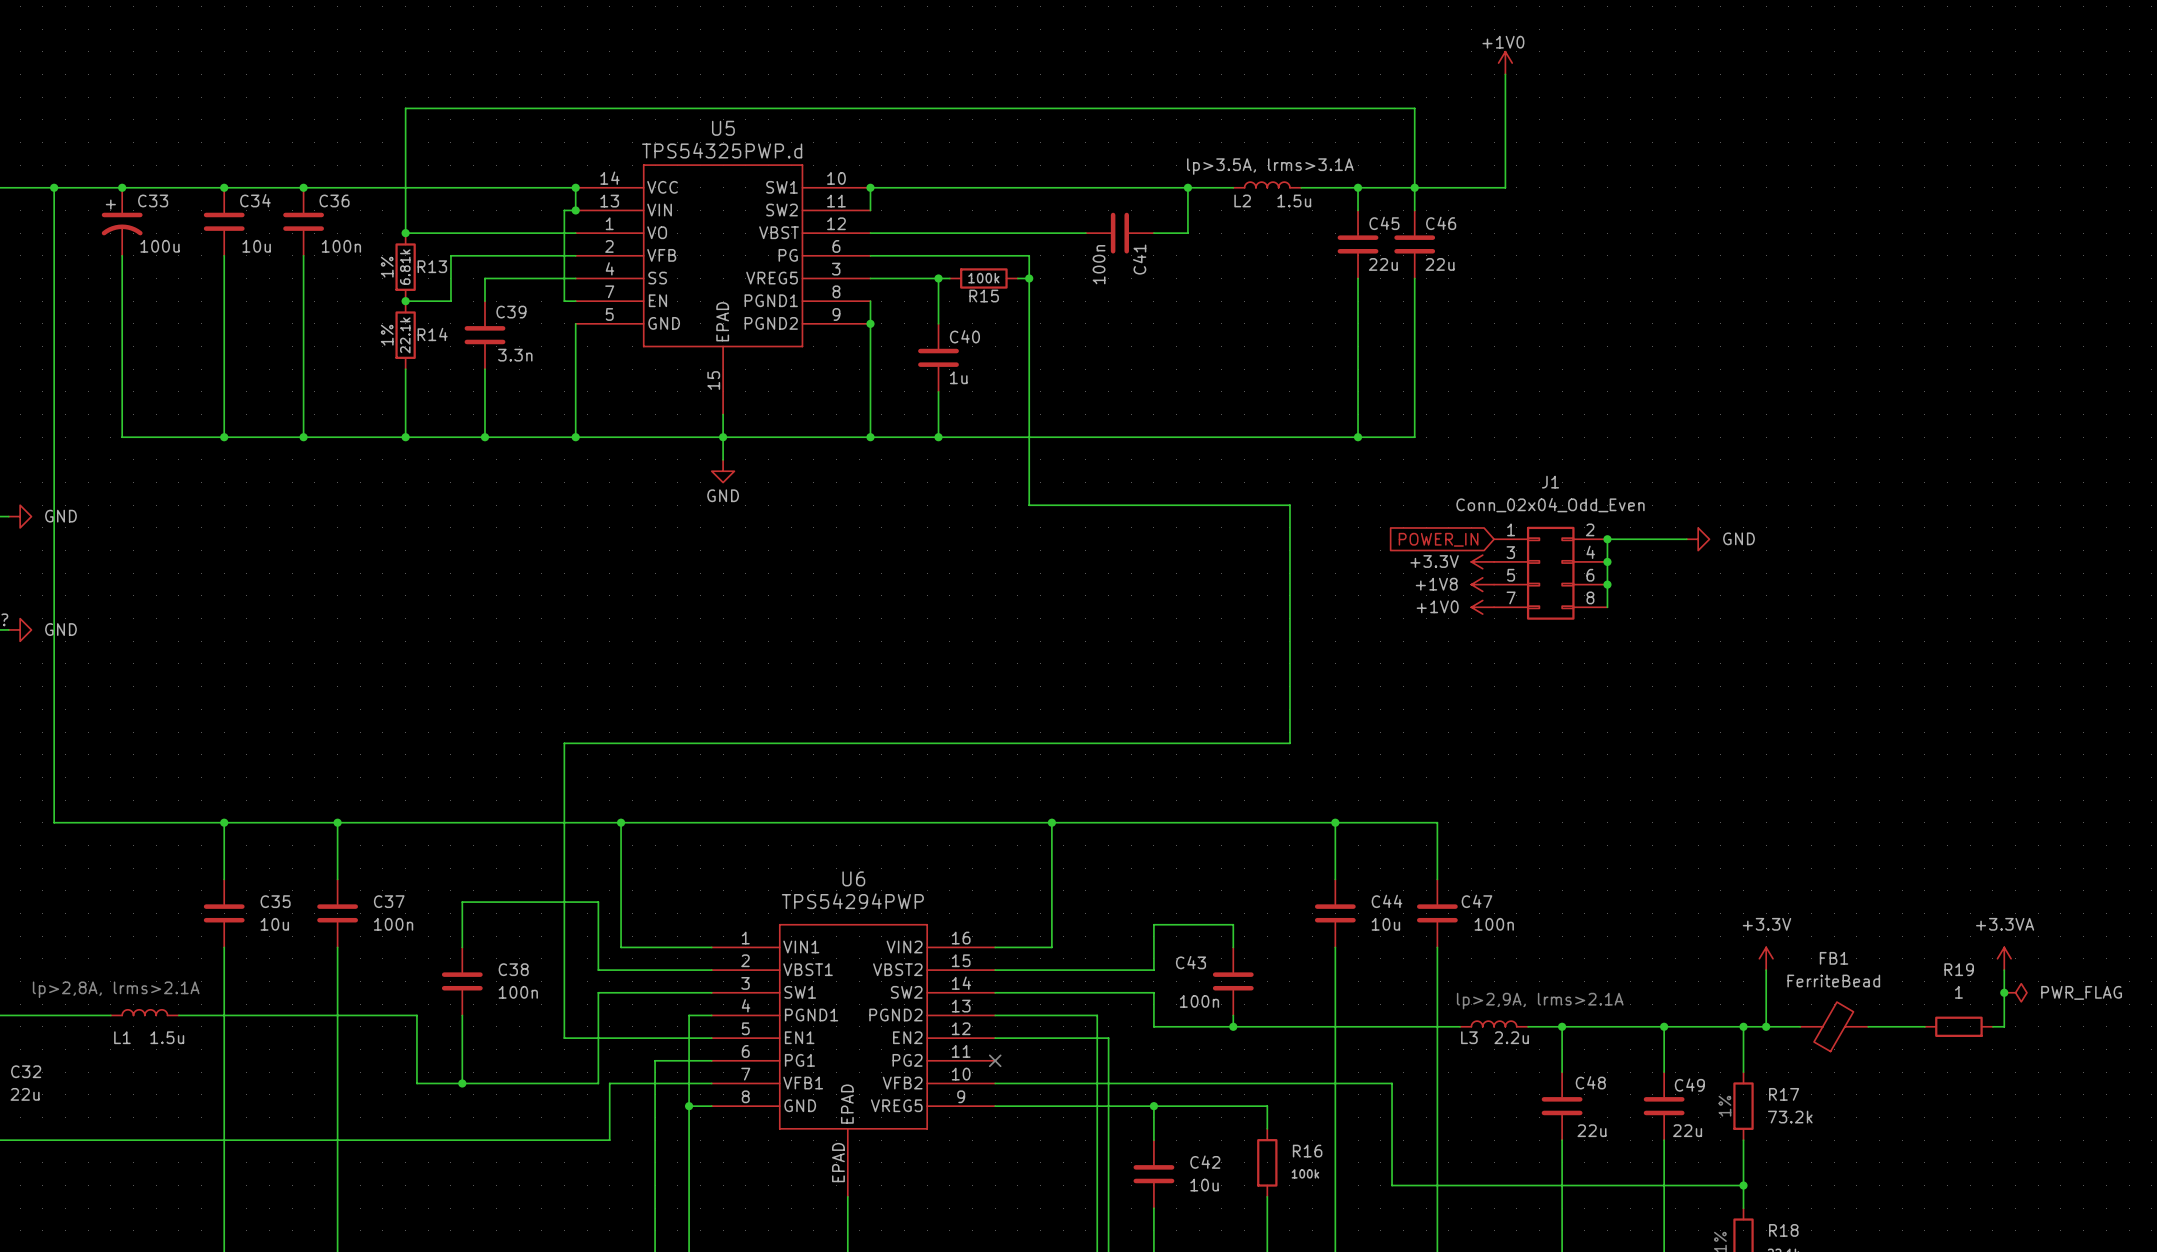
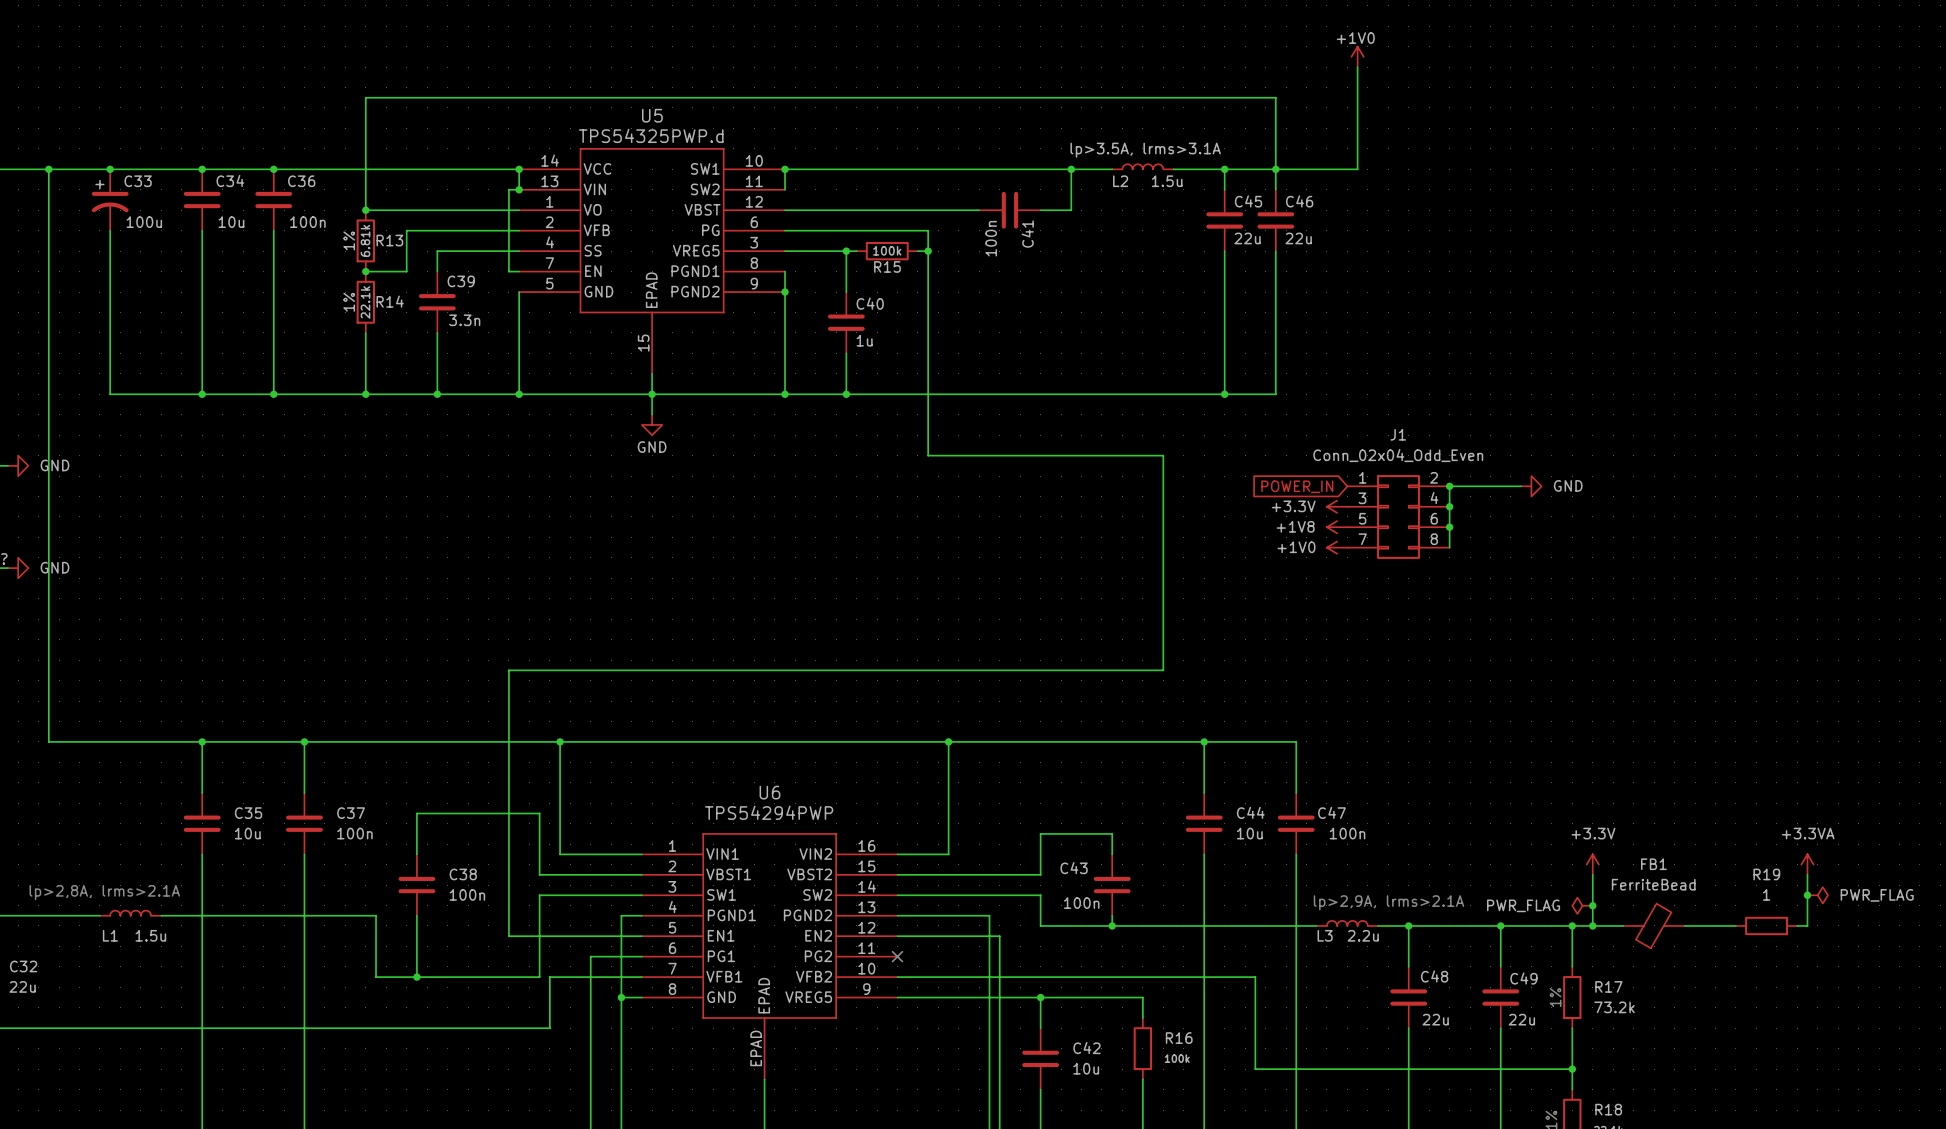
power symbol: none -> PWR_FLAG (1582, 905)
junction: none -> (1592, 905)

